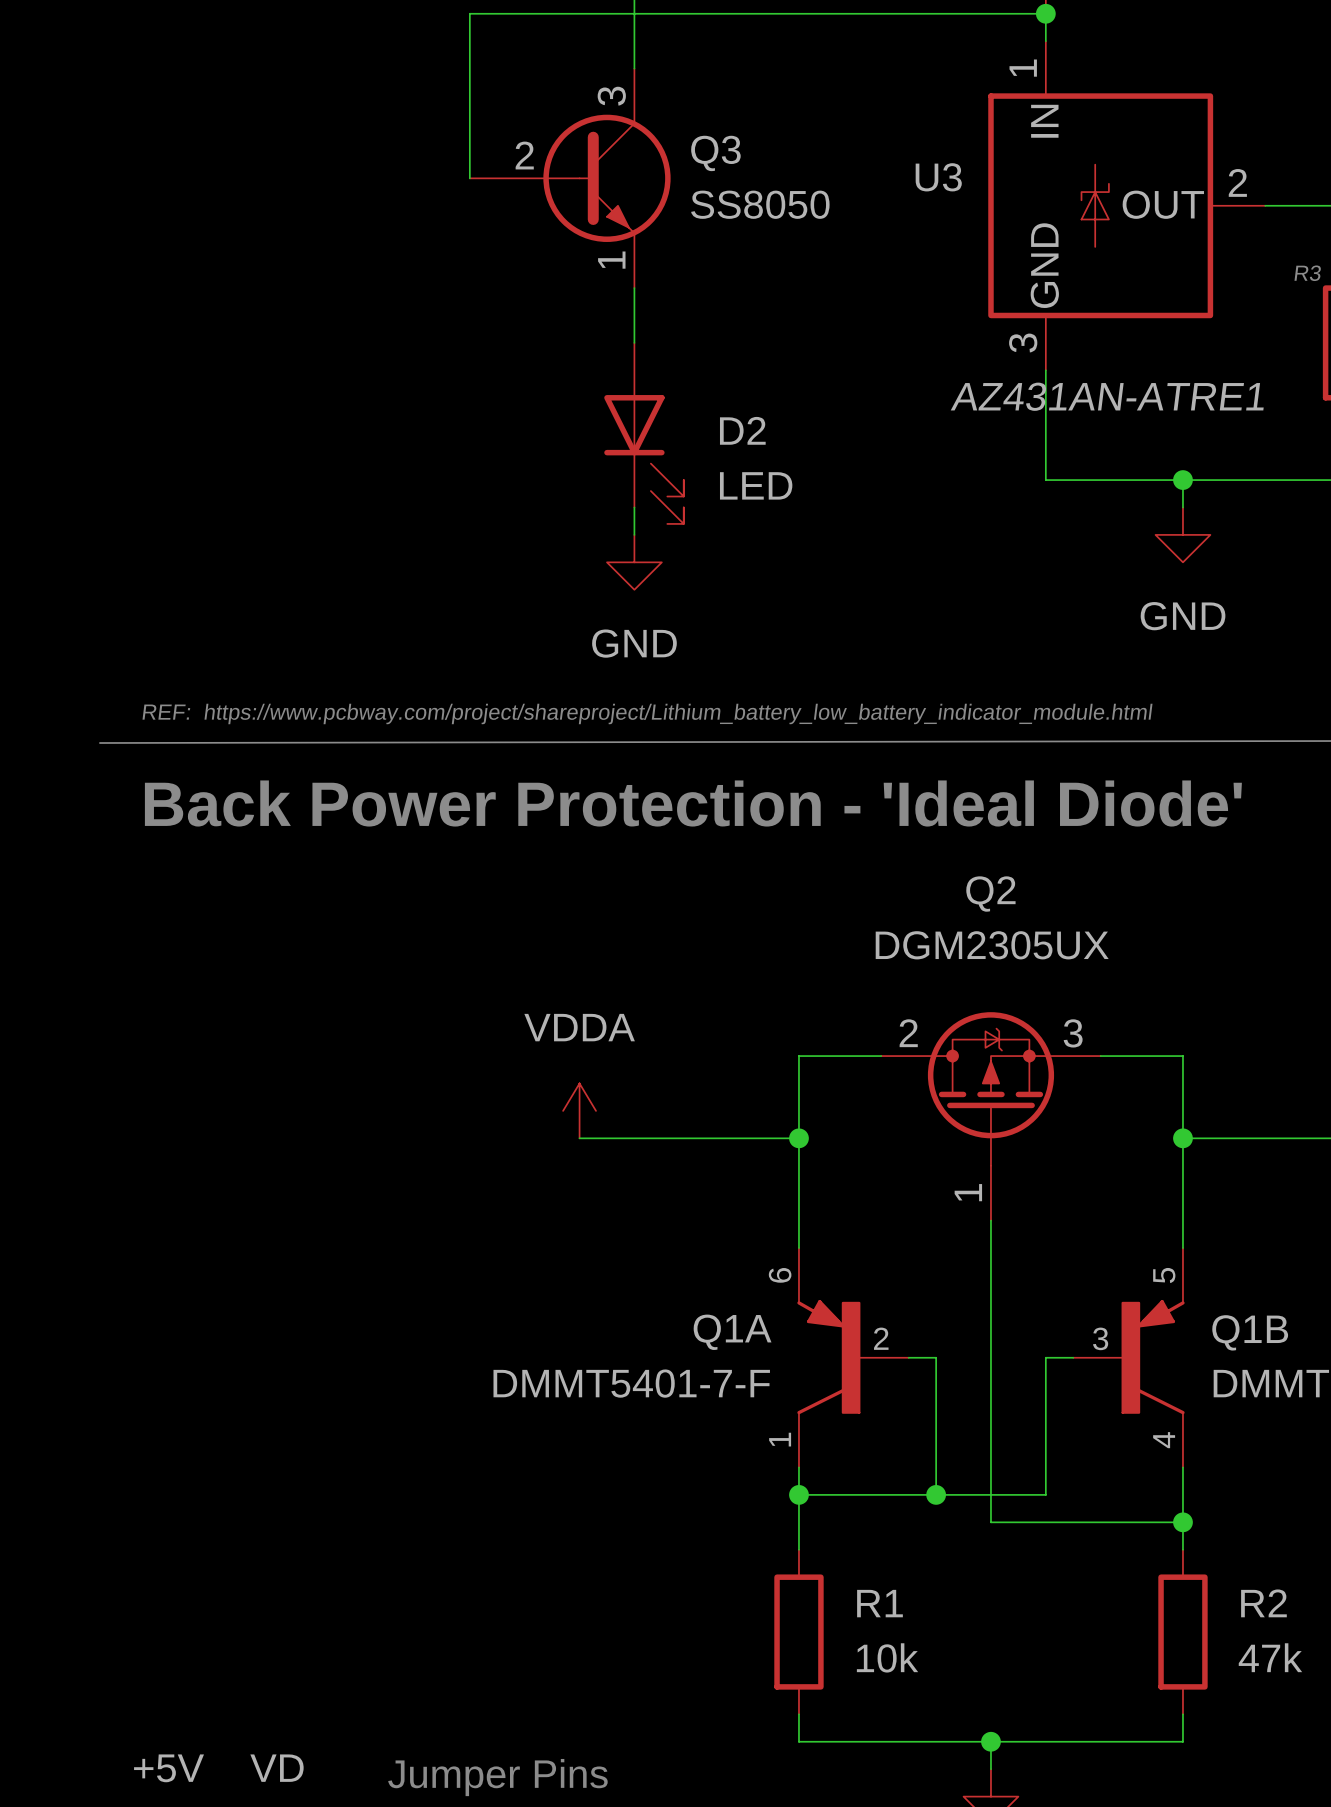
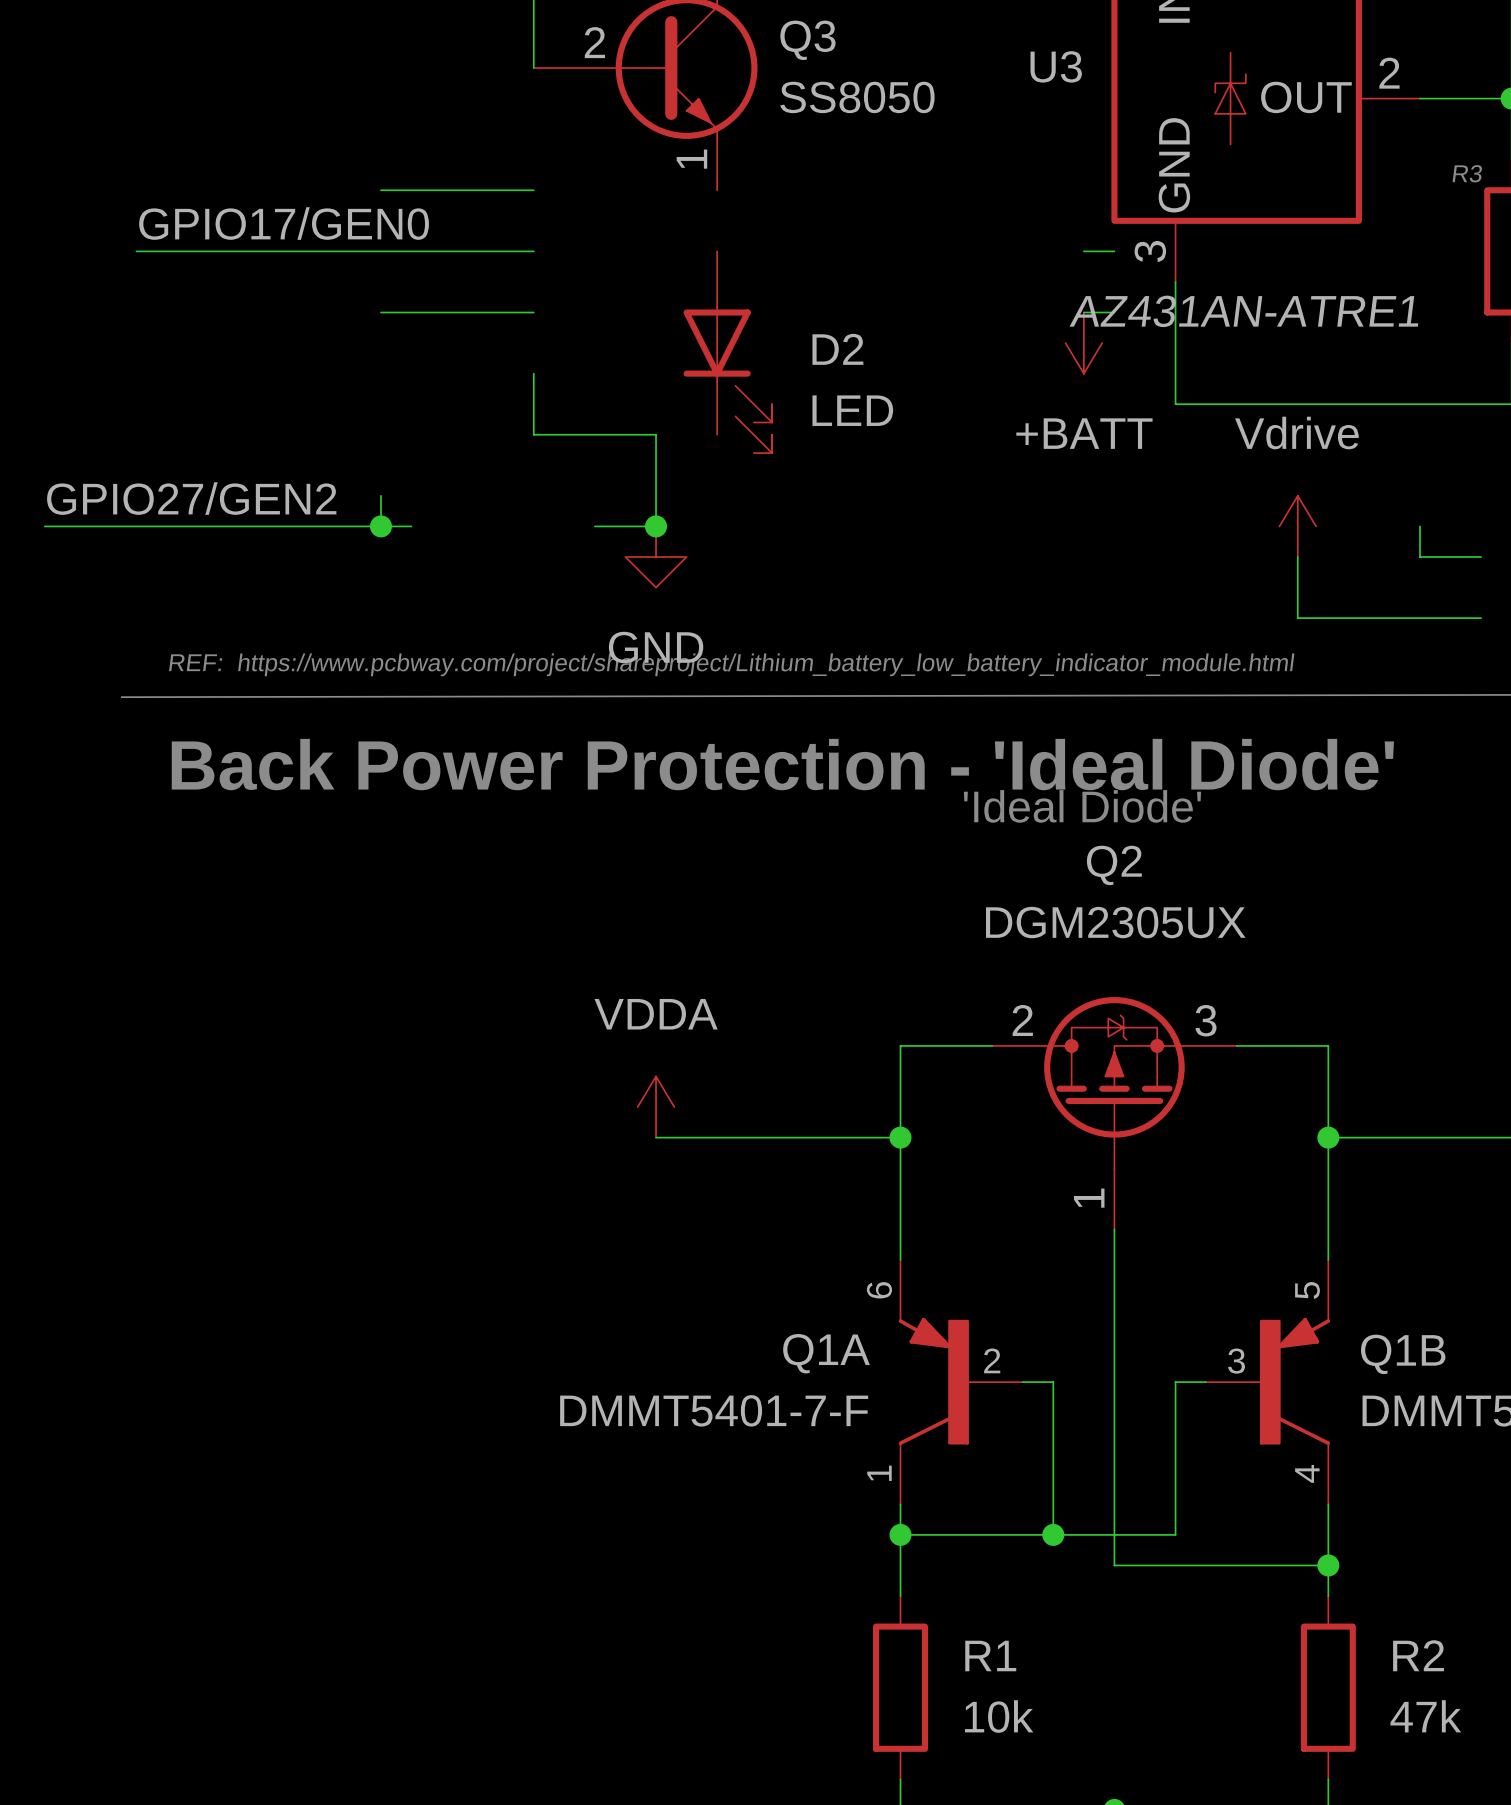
wire: none -> (380, 190) (533, 190)
wire: (634, 288) (634, 342) -> none
label: none -> GPIO17/GEN0 (284, 223)
wire: none -> (136, 251) (533, 251)
wire: none -> (1083, 251) (1114, 251)
wire: none -> (380, 312) (533, 312)
wire: none -> (1083, 312) (1114, 312)
power symbol: none -> +BATT (1083, 343)
wire: none -> (533, 373) (533, 434) (656, 434) (656, 526) (594, 526)
wire: (1182, 480) (1182, 507) -> none
junction: (1182, 480) -> none
wire: (634, 507) (634, 534) -> (380, 495) (380, 526)
power symbol: GND (1182, 534) -> none
power symbol position: GND (634, 562) -> GND (656, 556)
label: none -> GPIO27/GEN2 (191, 498)
wire: none -> (44, 526) (411, 526)
junction: none -> (380, 526)
junction: none -> (656, 526)
power symbol: none -> Vdrive (1297, 526)
wire: none -> (1420, 526) (1420, 556) (1481, 556)
wire: none -> (1297, 556) (1297, 618) (1481, 618)
text: none -> 'Ideal Diode' (1082, 806)

